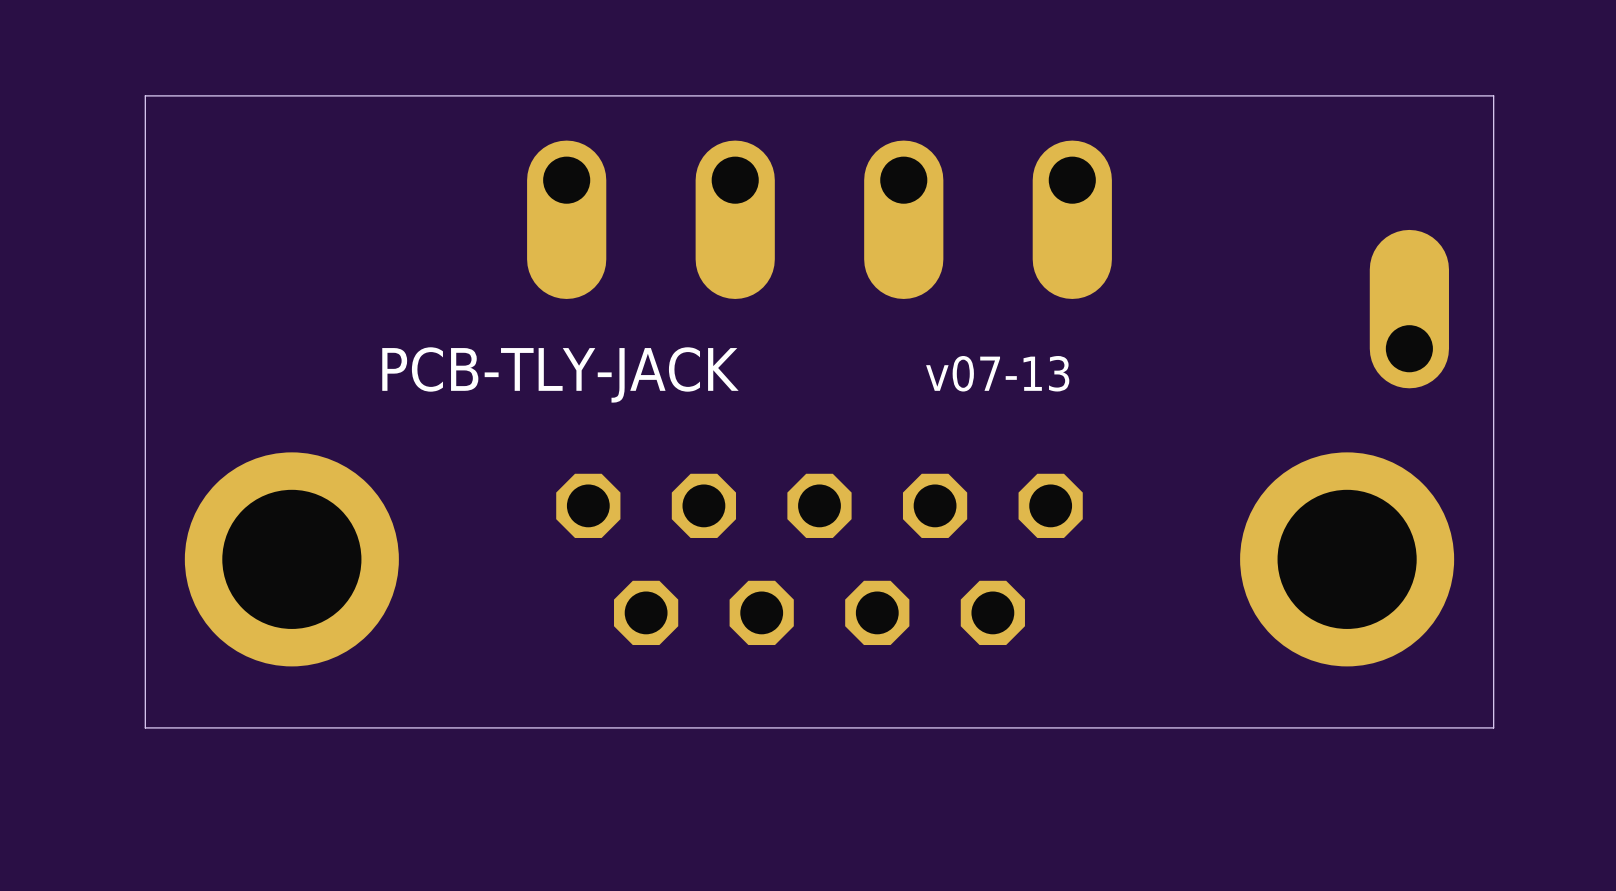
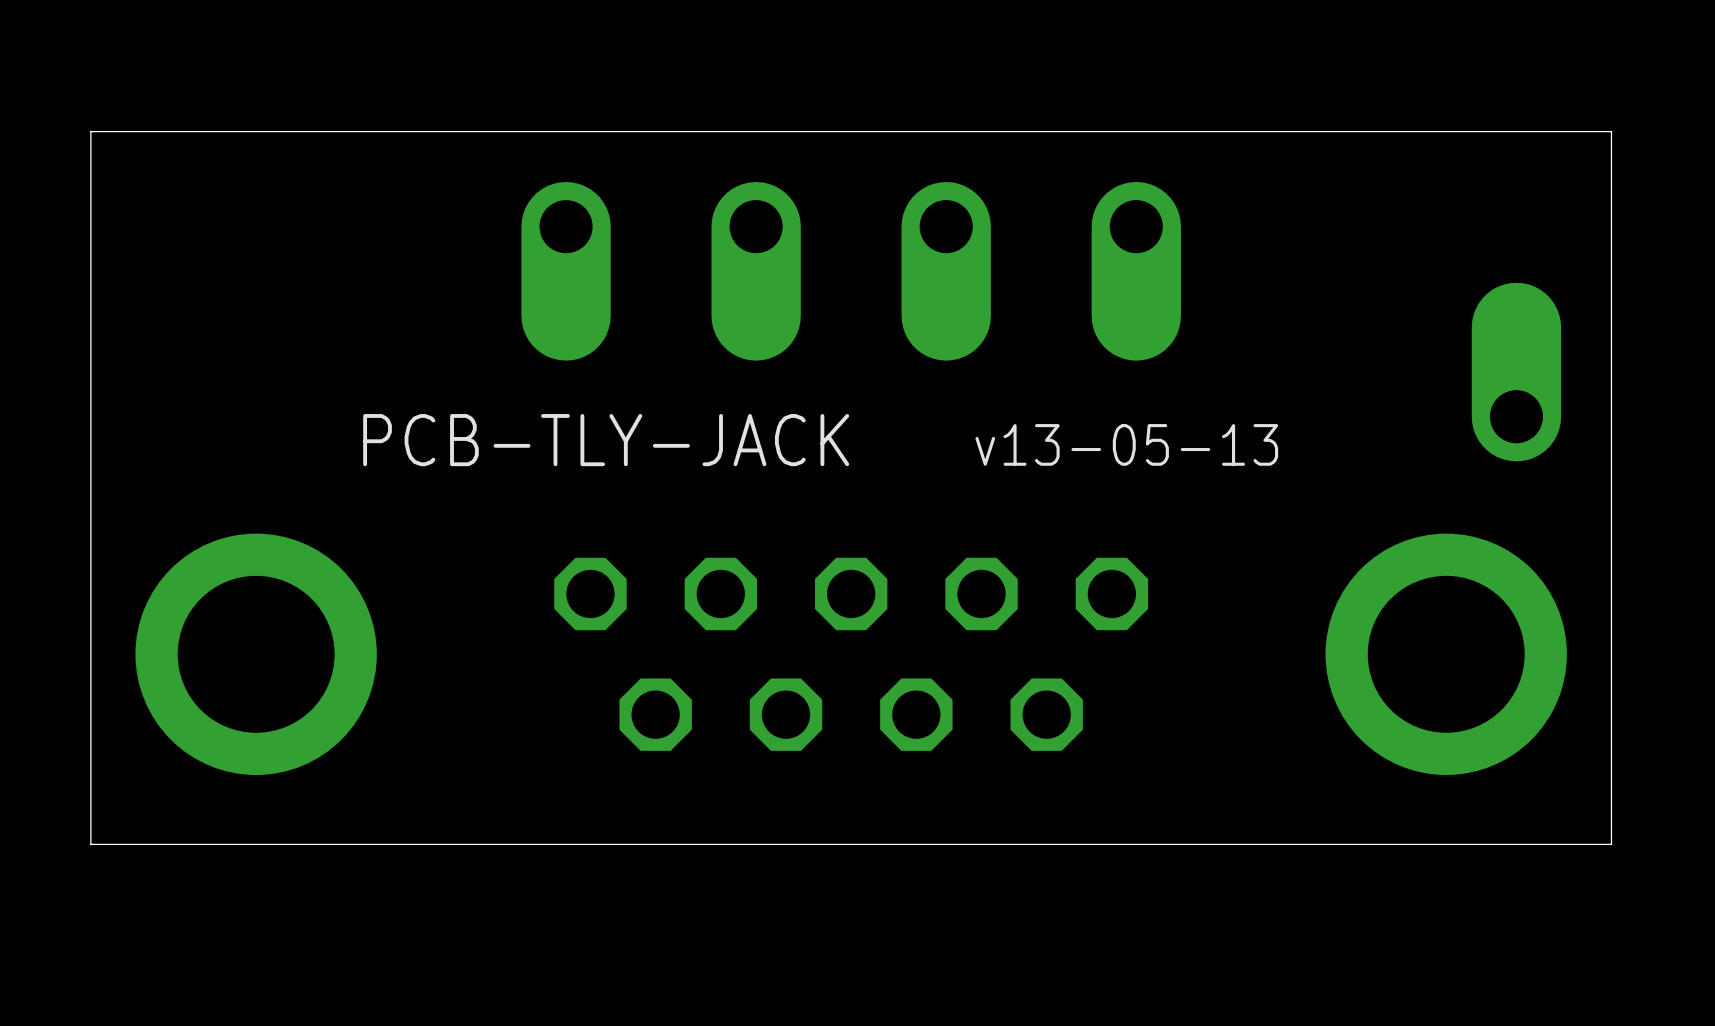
text: v07-13 (997, 373) -> v13-05-13 (1126, 444)

